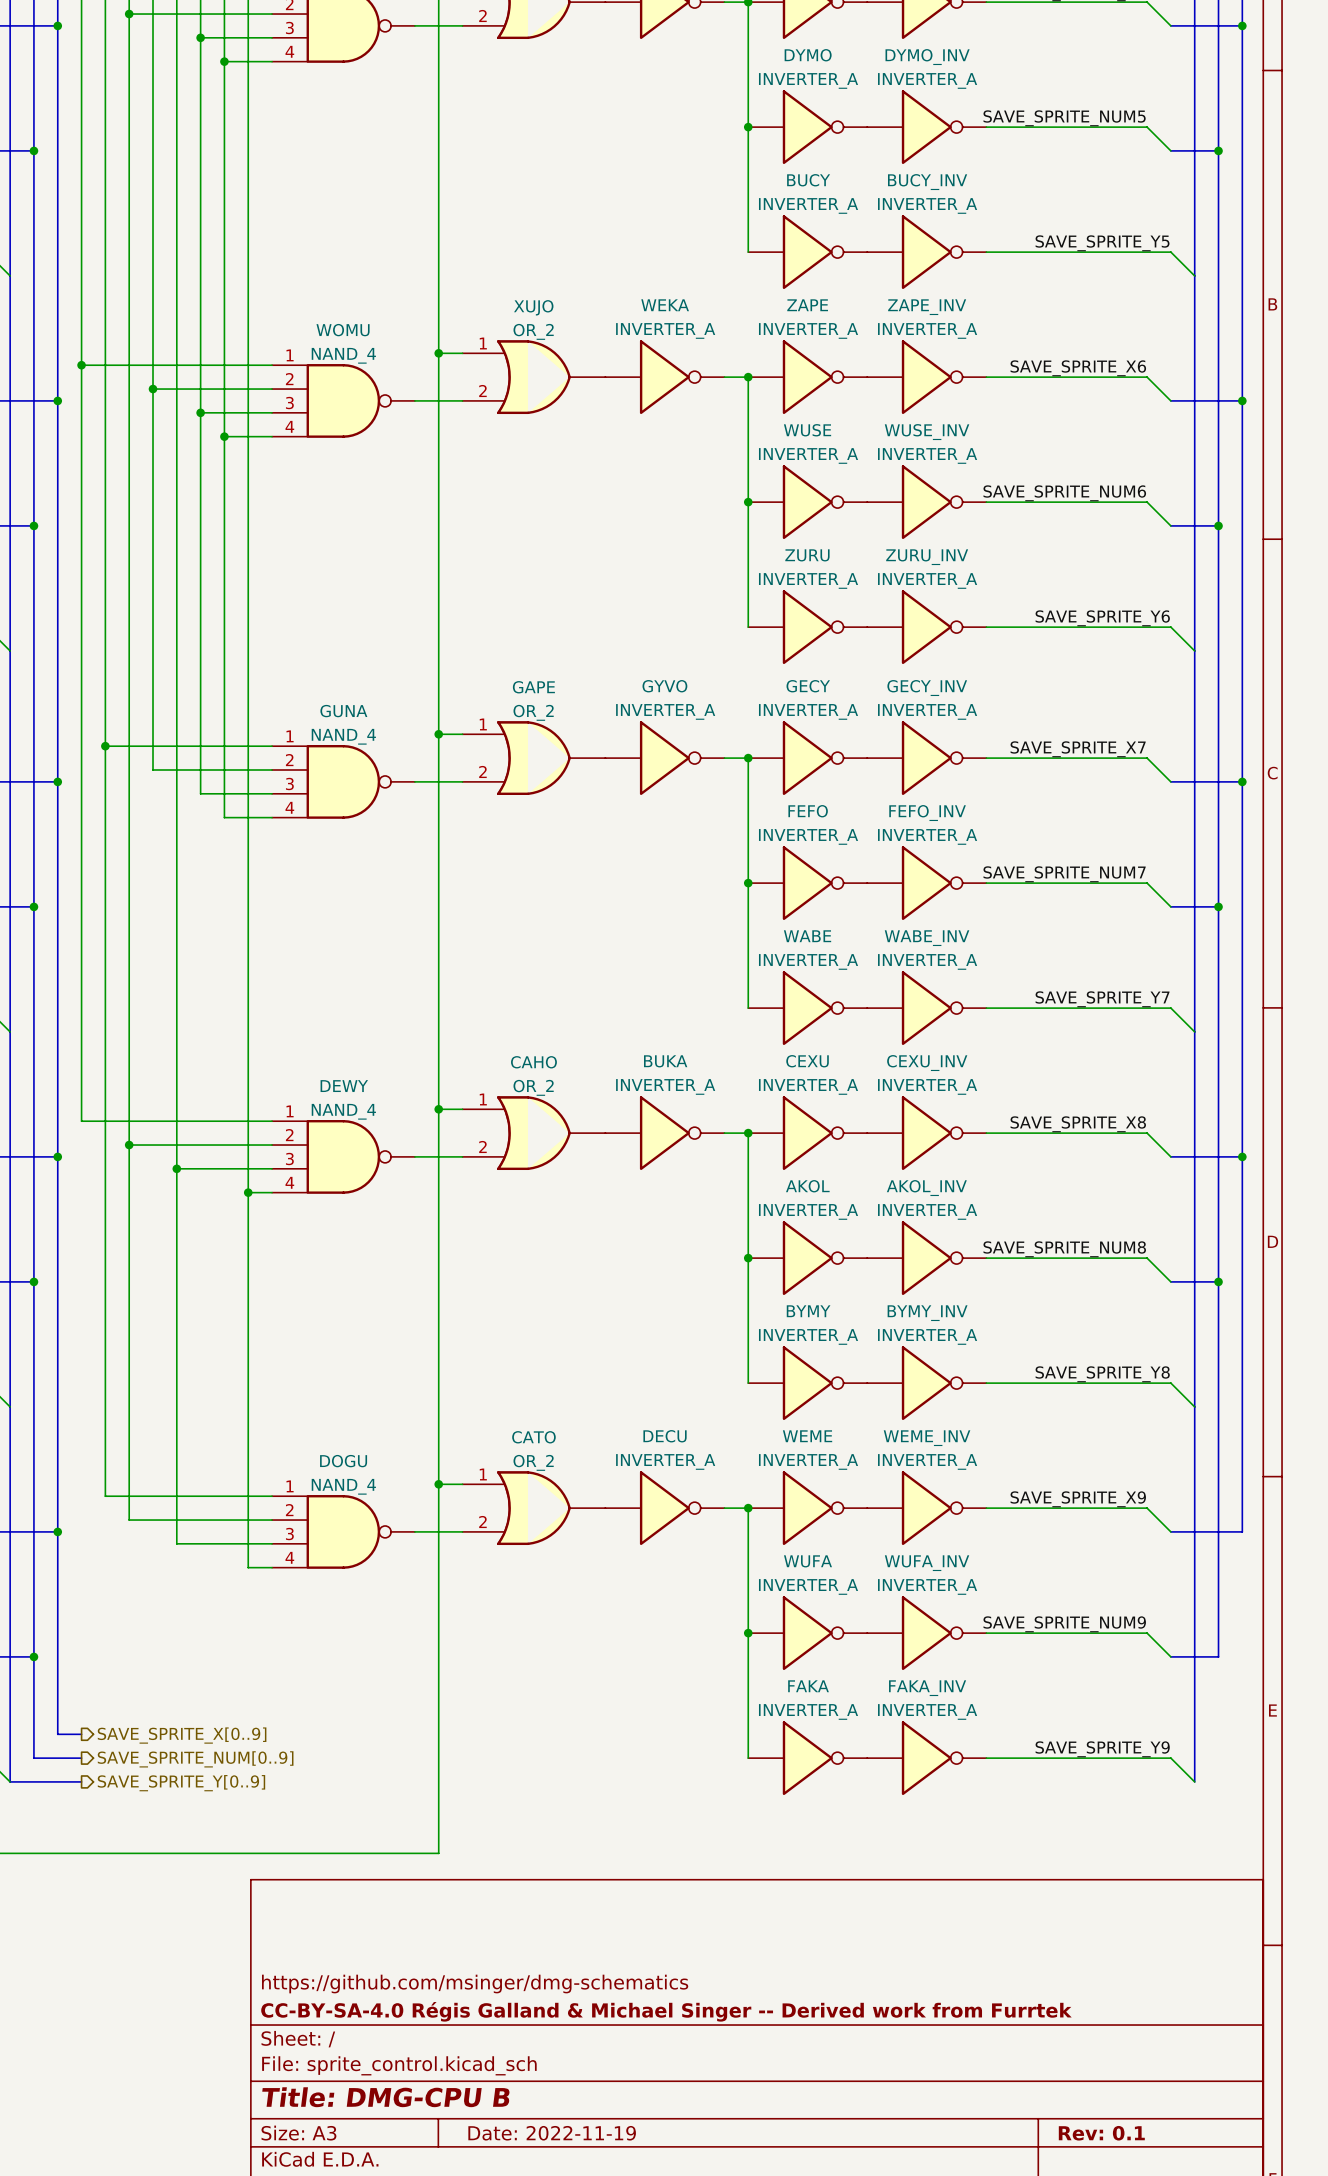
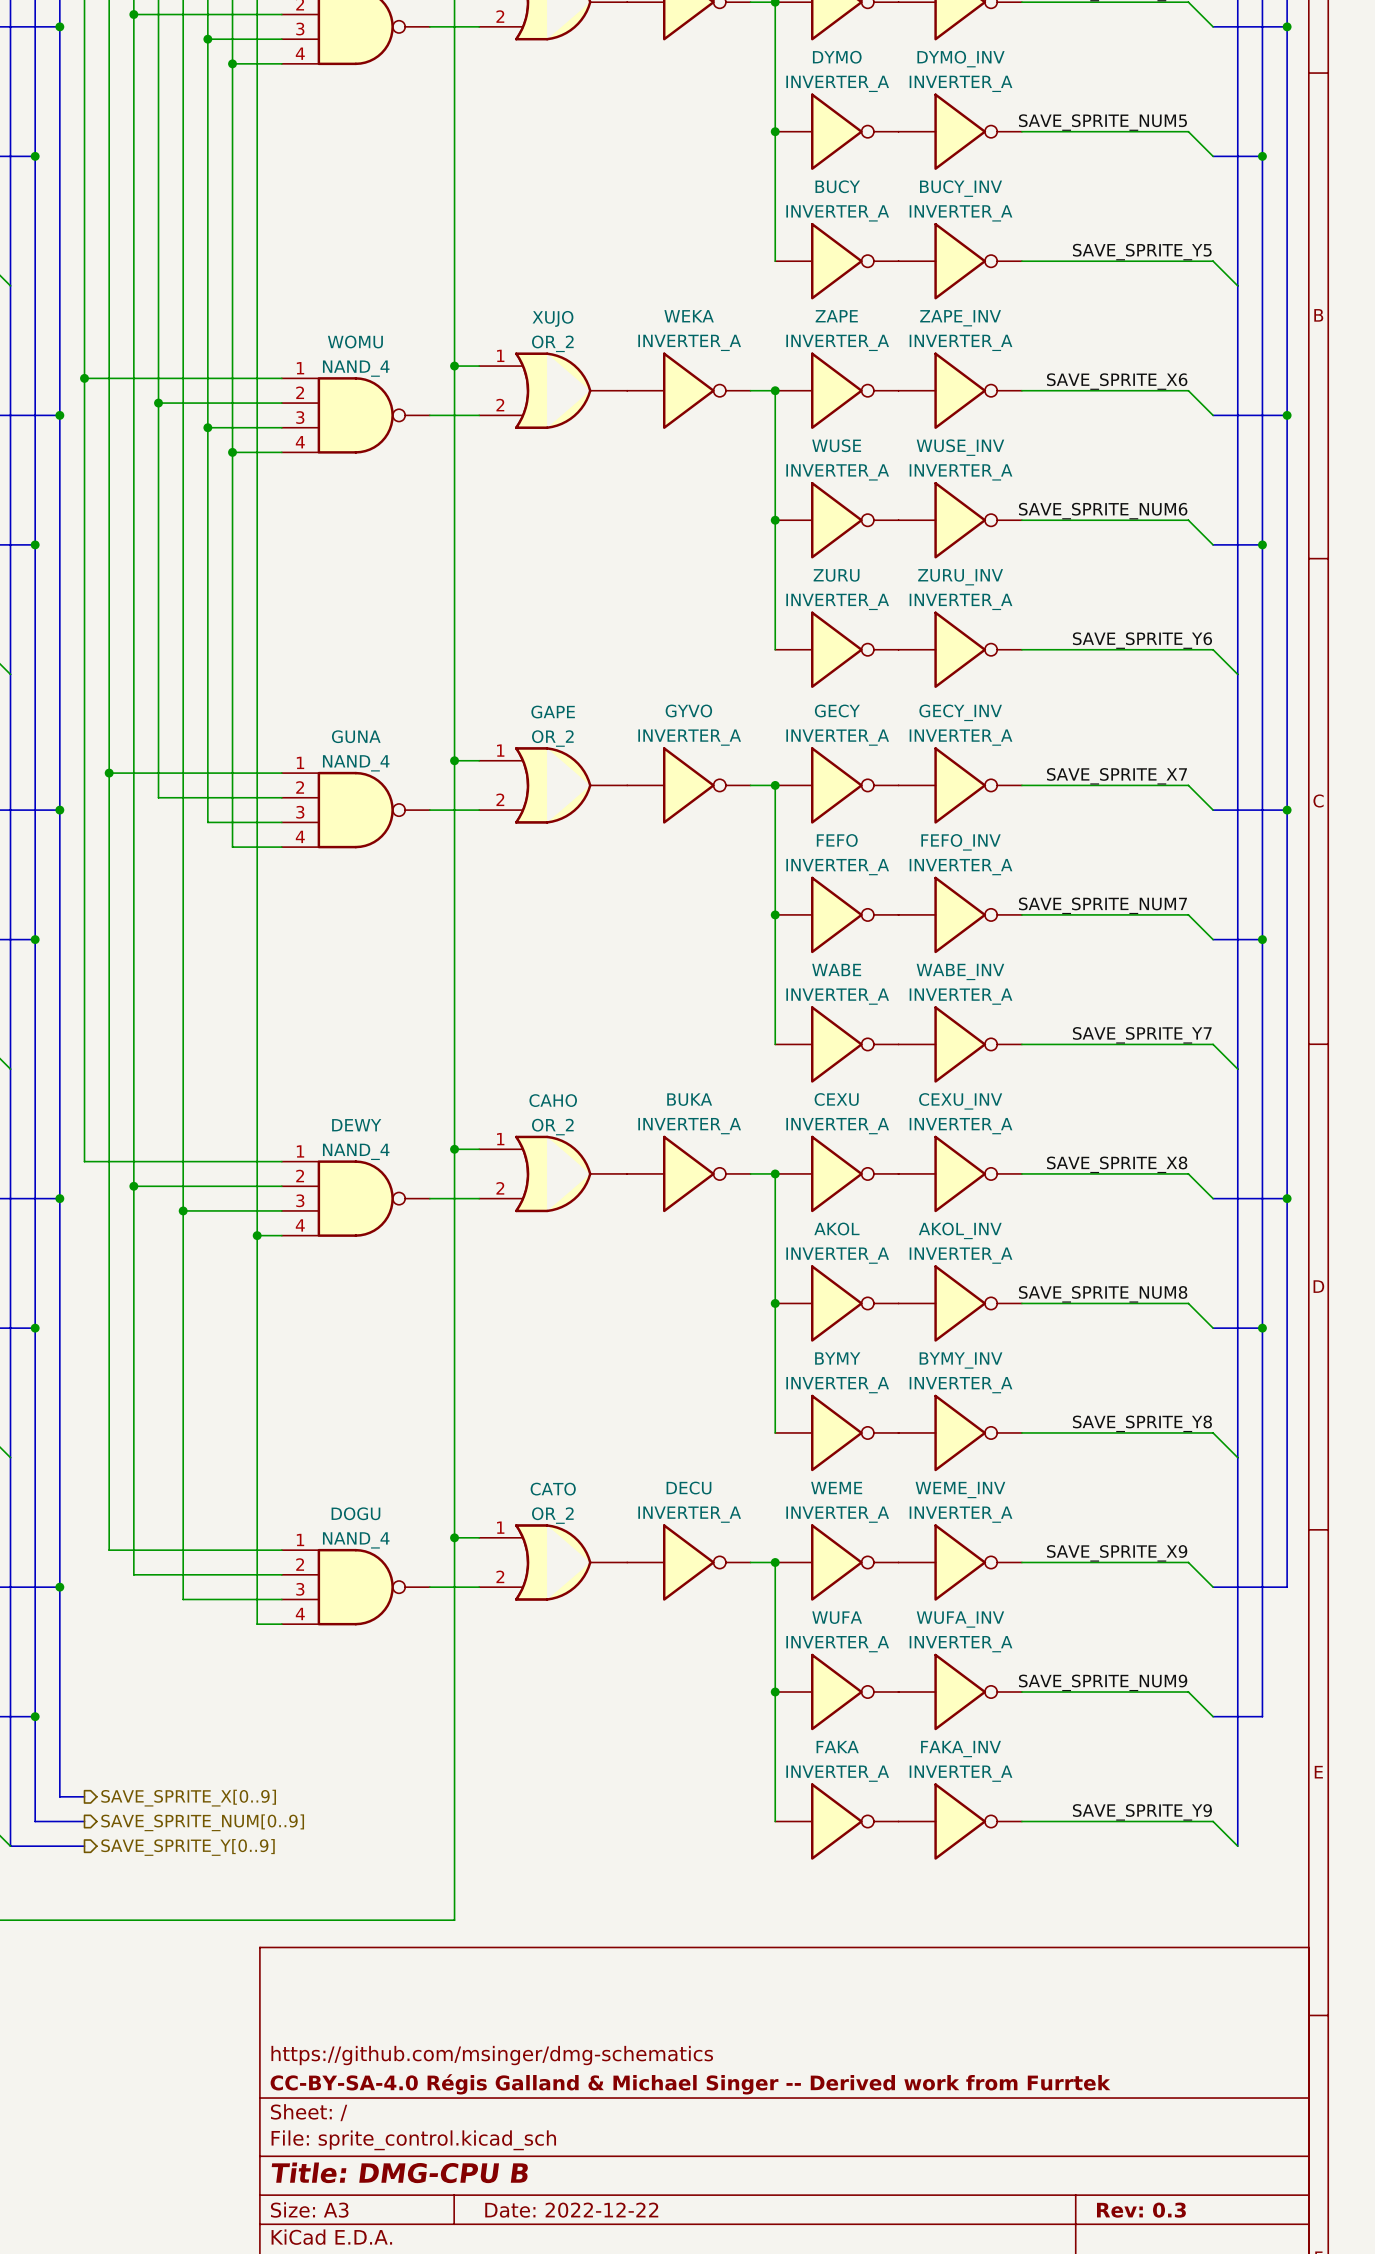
title block: Date: 2022-11-19 (552, 2133) -> Date: 2022-12-22 (571, 2210)
title block: Rev: 0.1 (1101, 2133) -> Rev: 0.3 (1141, 2210)

